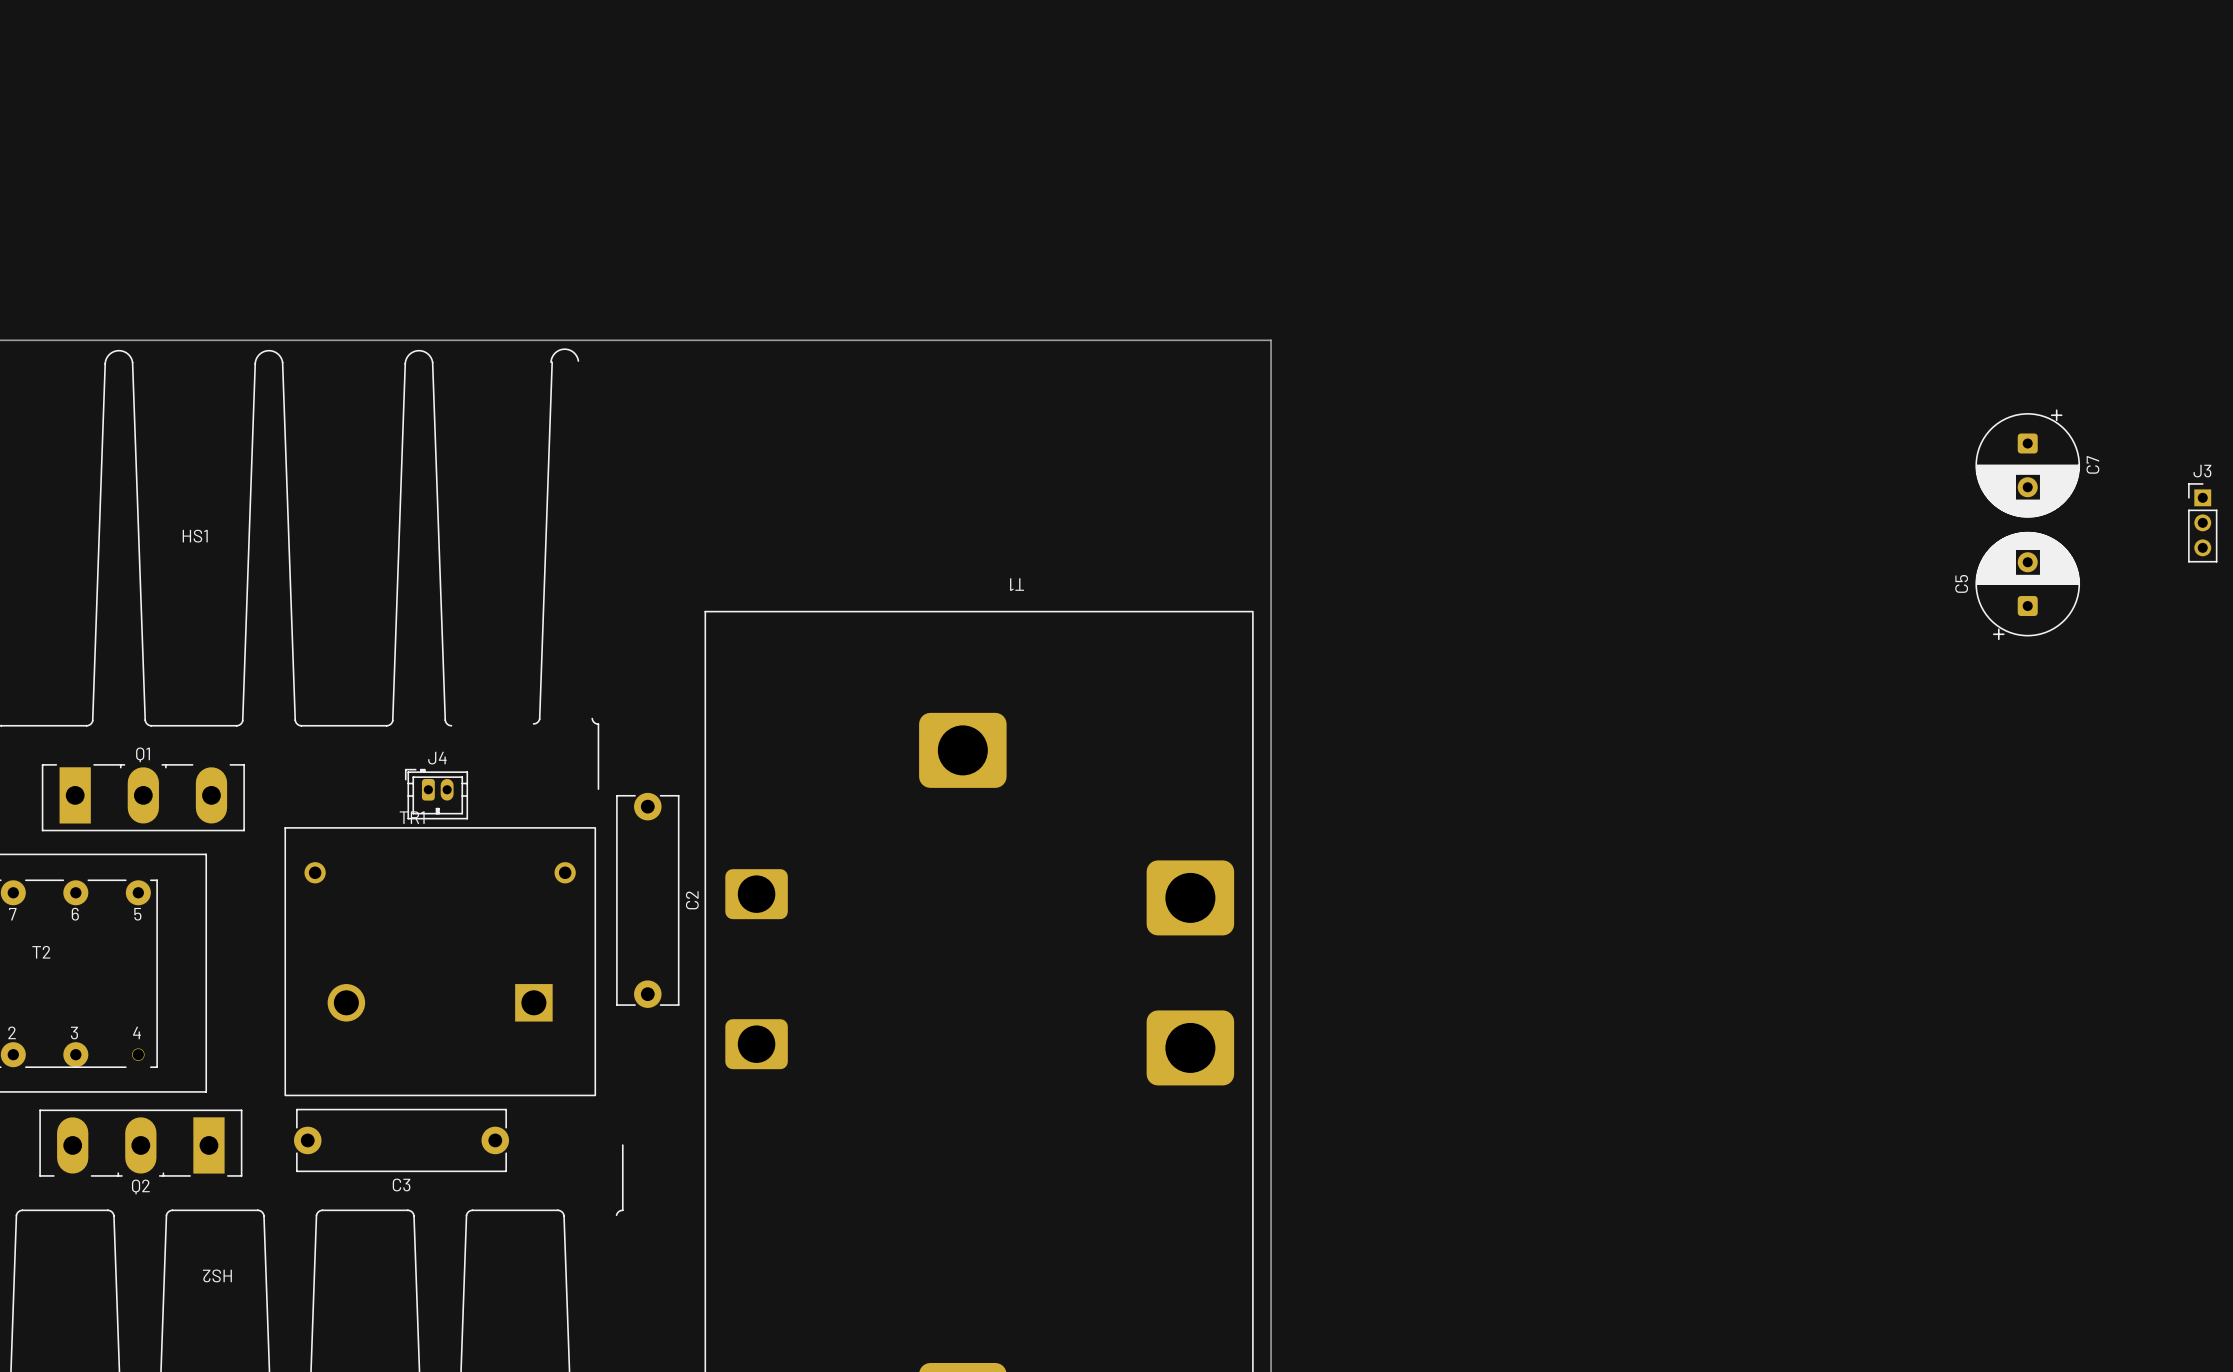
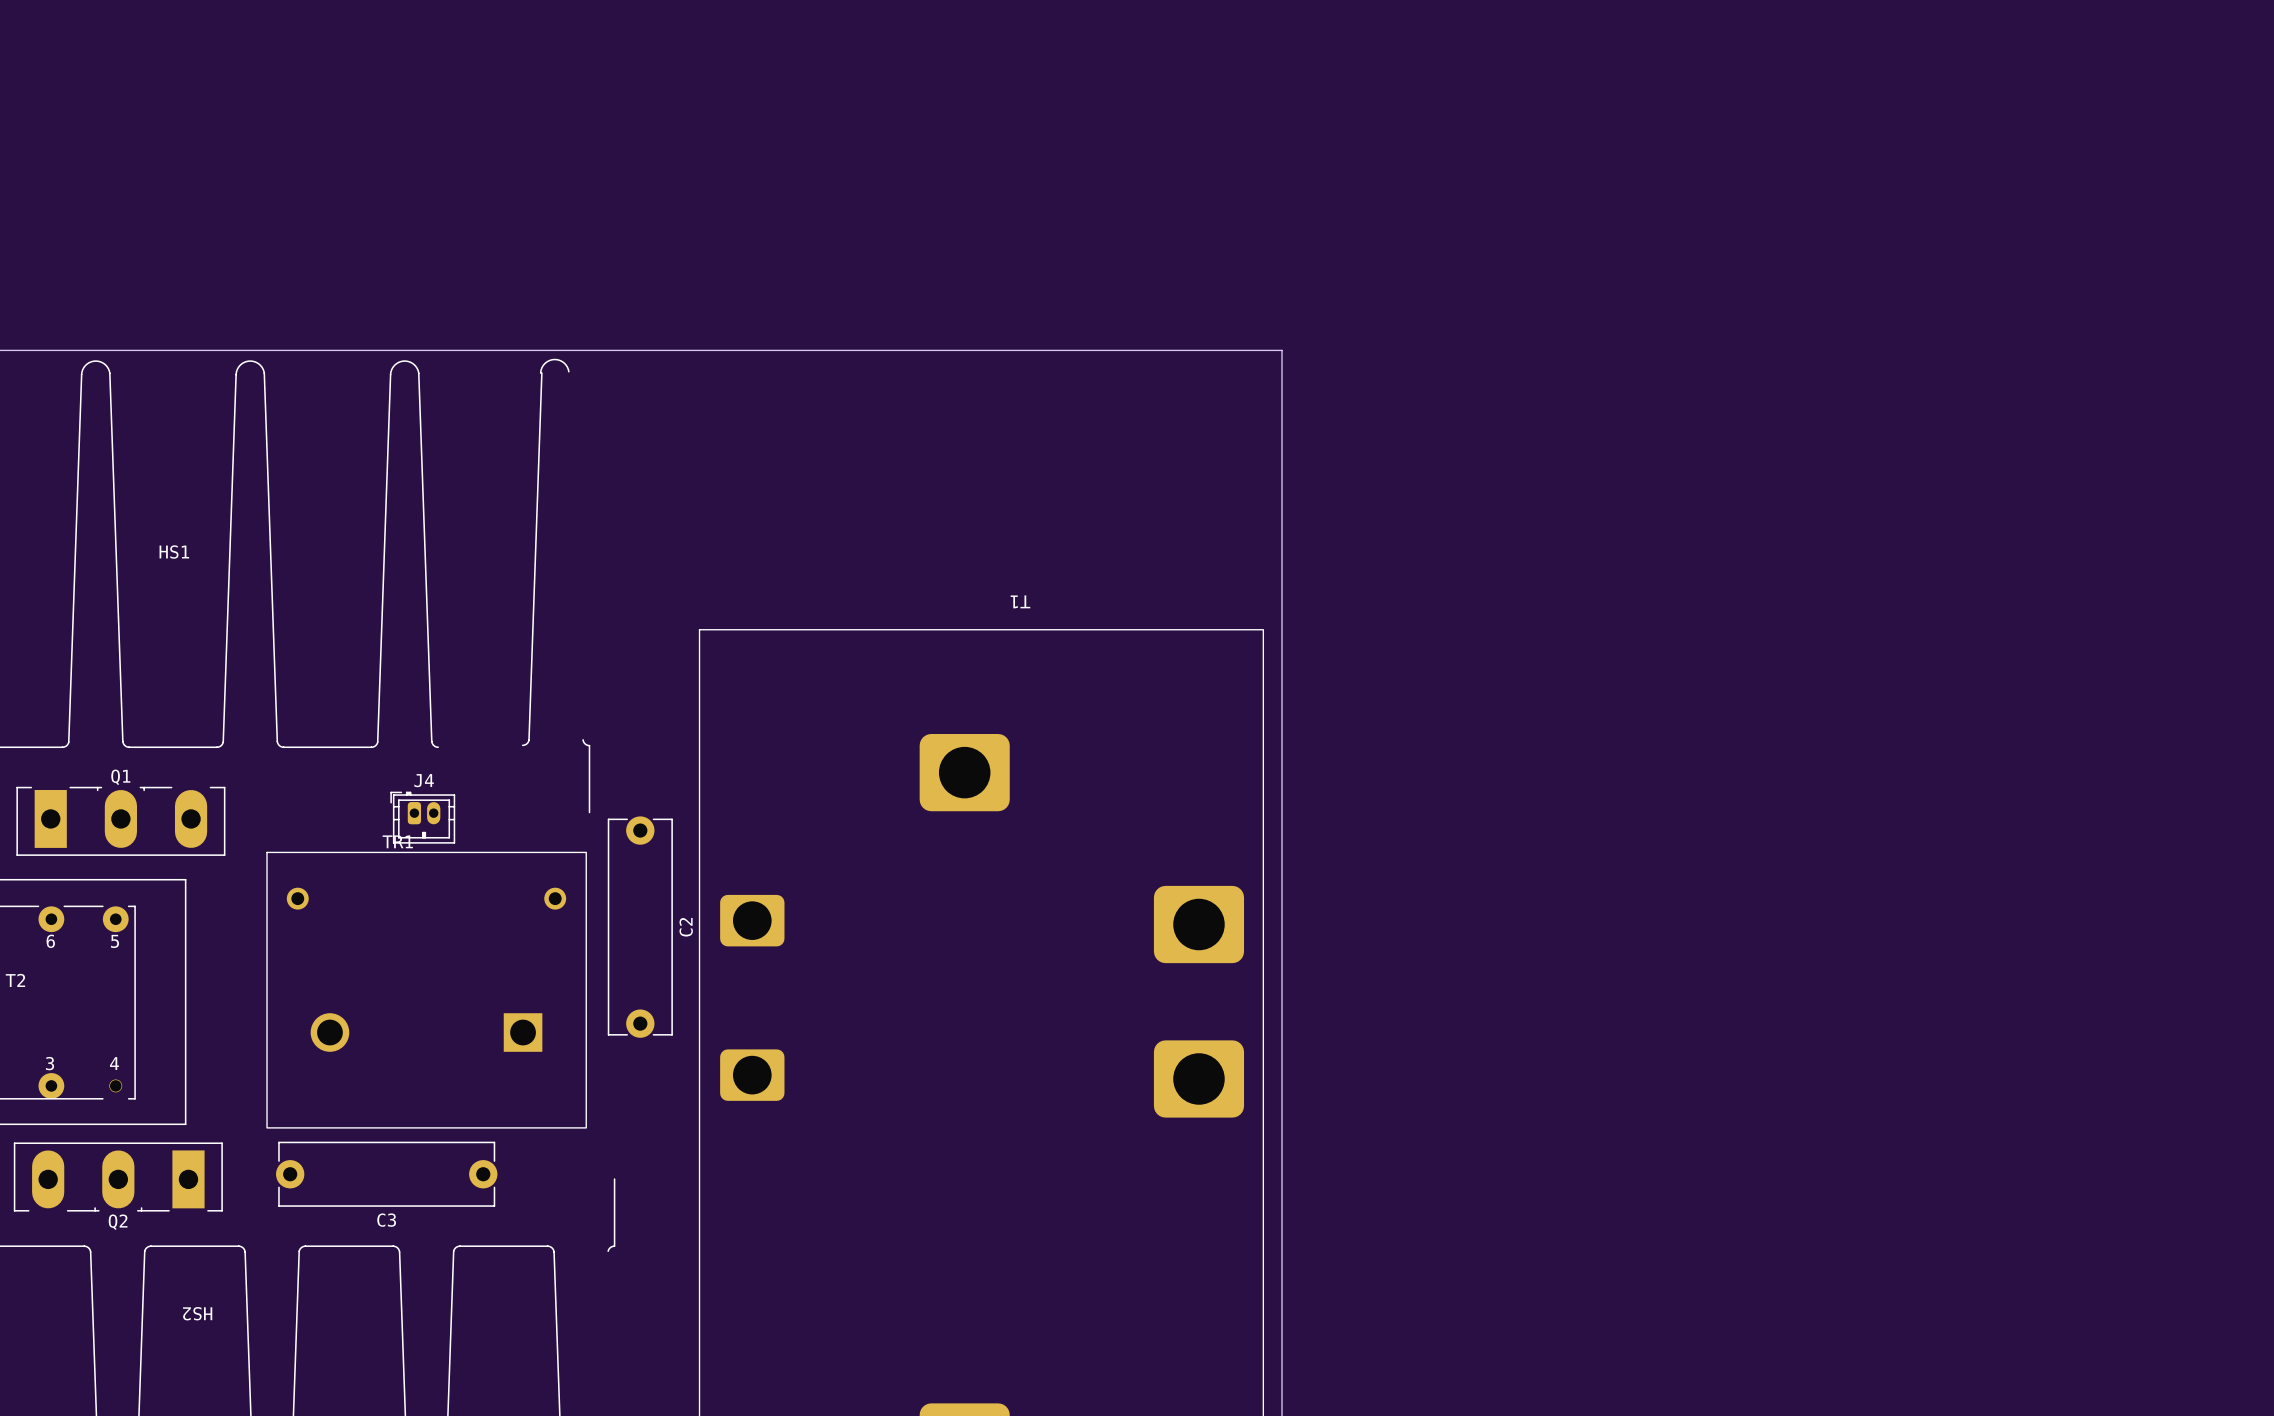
C7: (2027, 463) -> none
J3: (2202, 522) -> none
C5: (2027, 585) -> none

